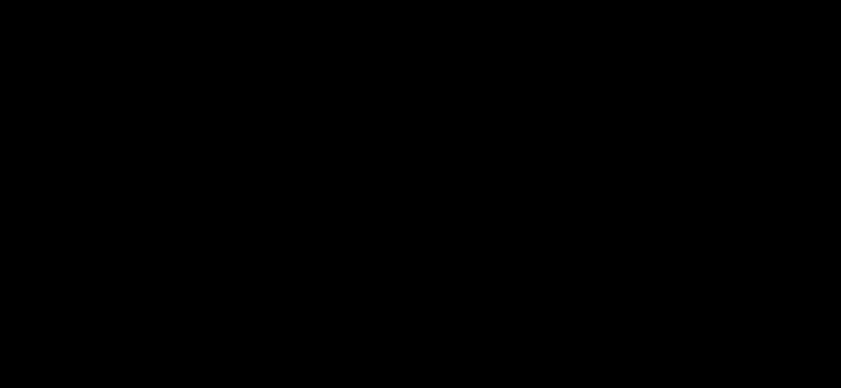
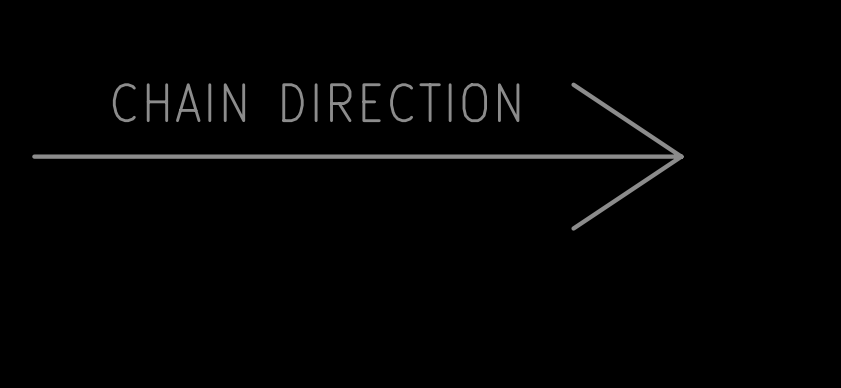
line: none -> (573, 84) (681, 156)
text: none -> CHAIN DIRECTION (316, 102)
line: none -> (34, 156) (681, 156)
line: none -> (681, 156) (573, 228)

